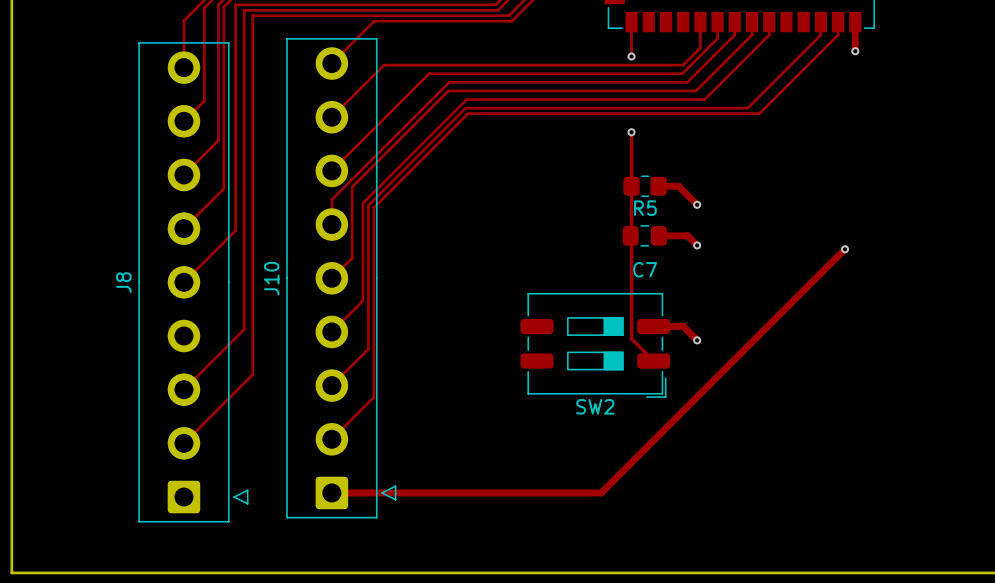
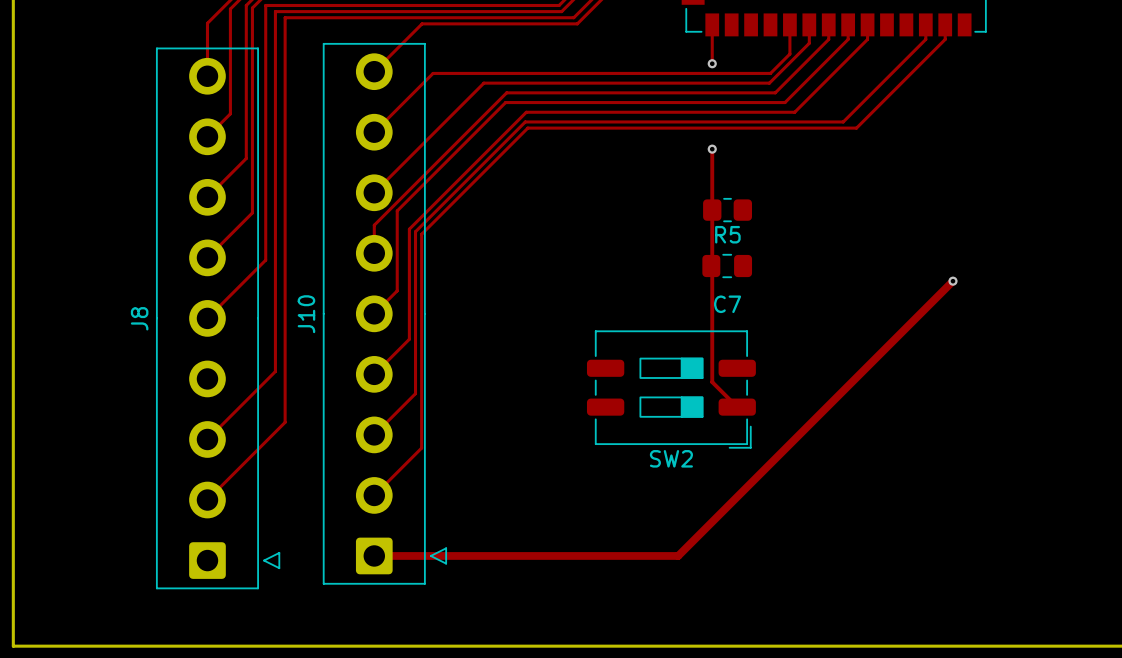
track: (855, 22) (855, 51) -> none
via: (855, 51) -> none
track: (658, 186) (678, 186) (697, 204) -> none
via: (697, 204) -> none
track: (658, 235) (687, 235) (697, 245) -> none
via: (697, 245) -> none
track: (653, 326) (683, 326) (697, 340) -> none
via: (697, 340) -> none

